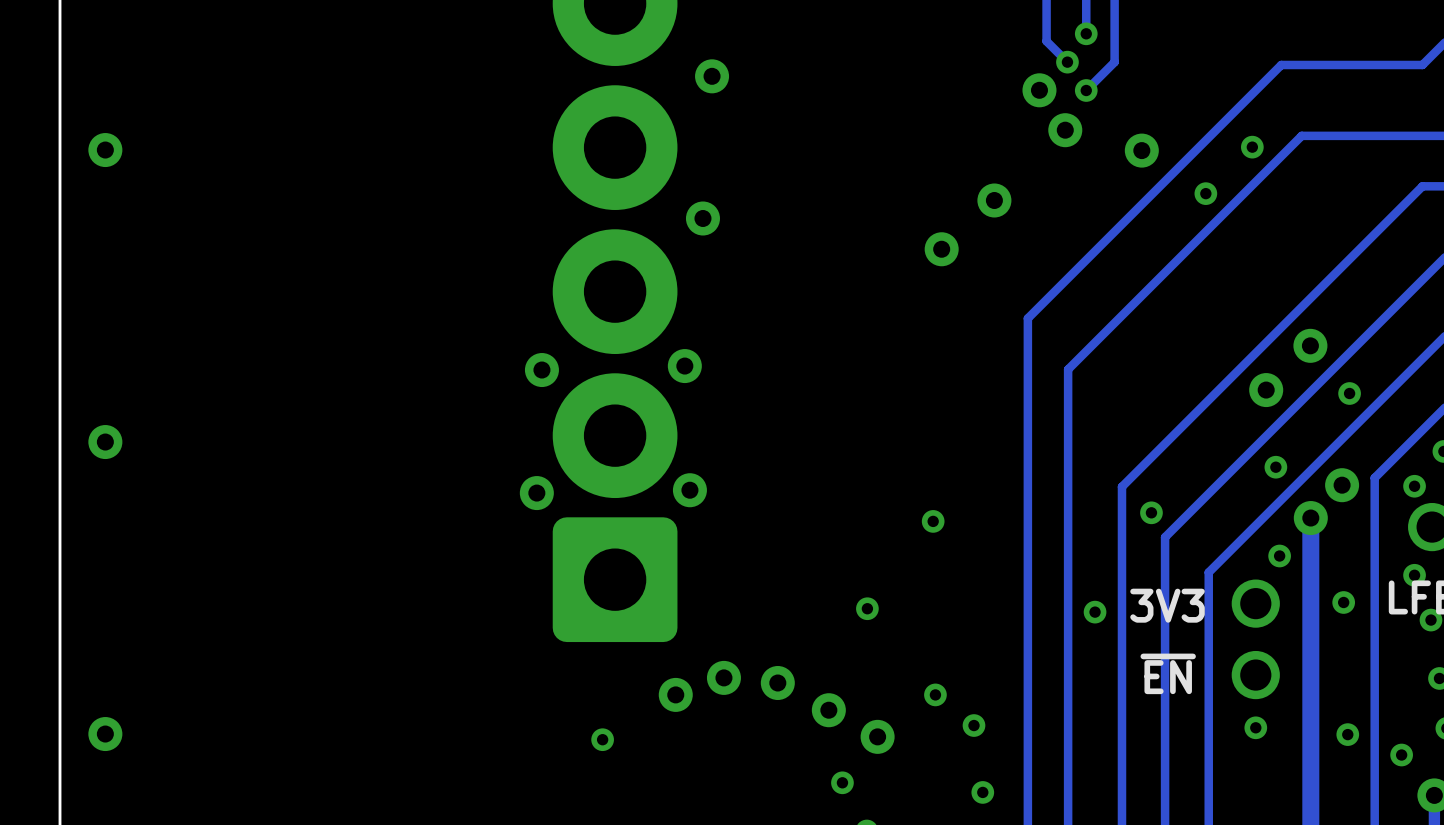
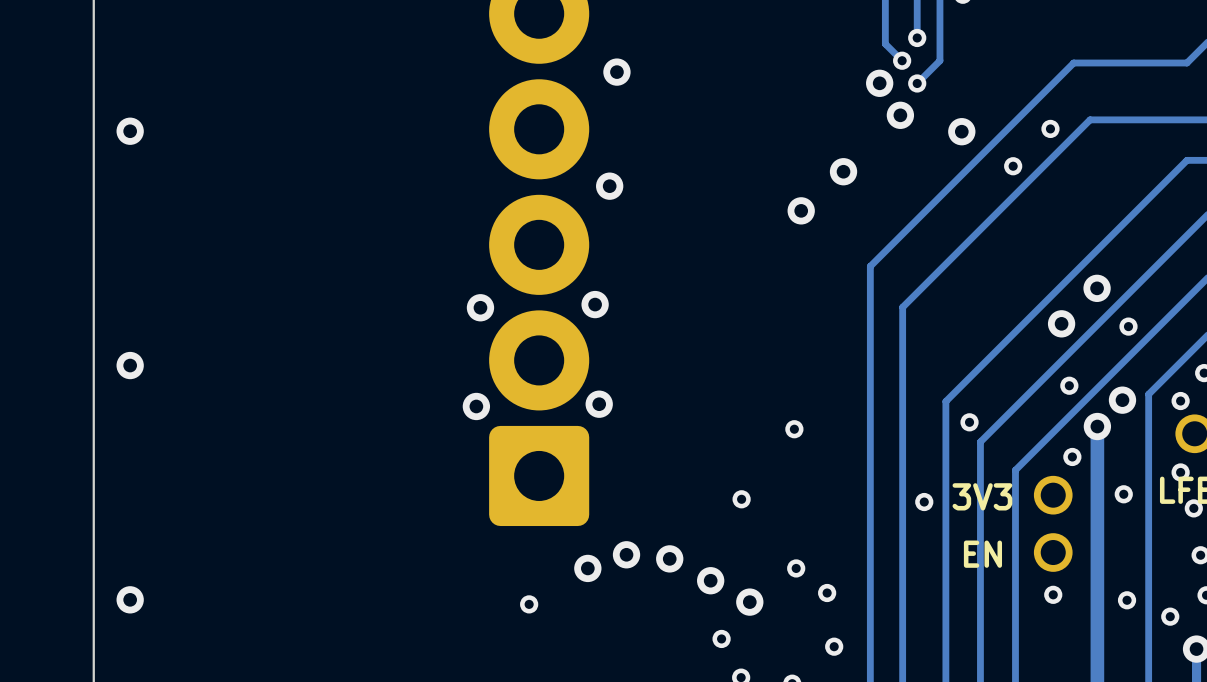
part text: ~{EN} (1168, 673) -> EN (982, 554)

